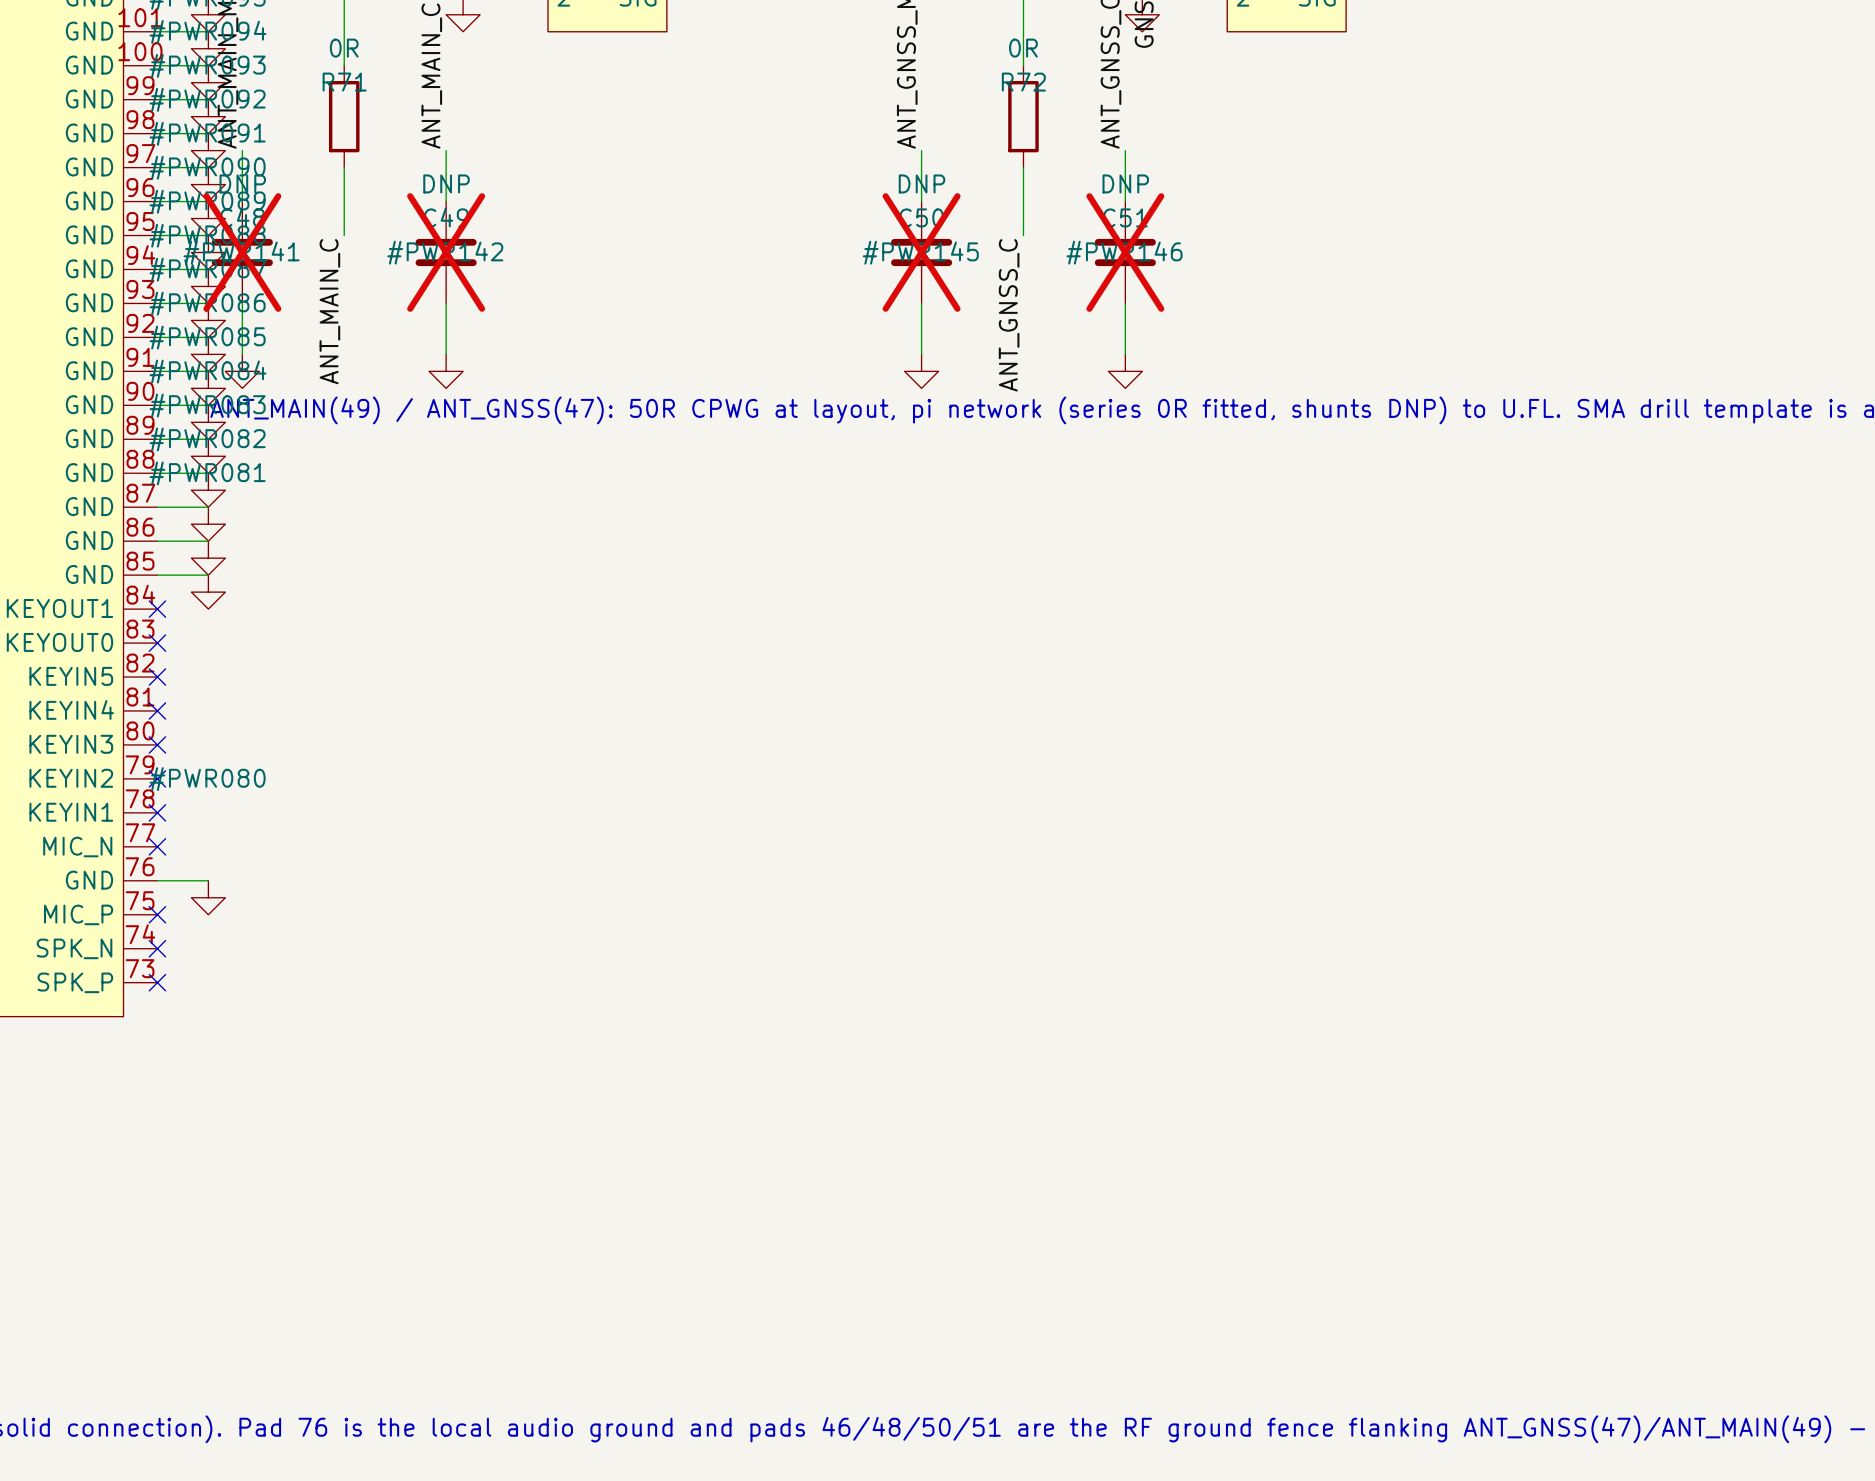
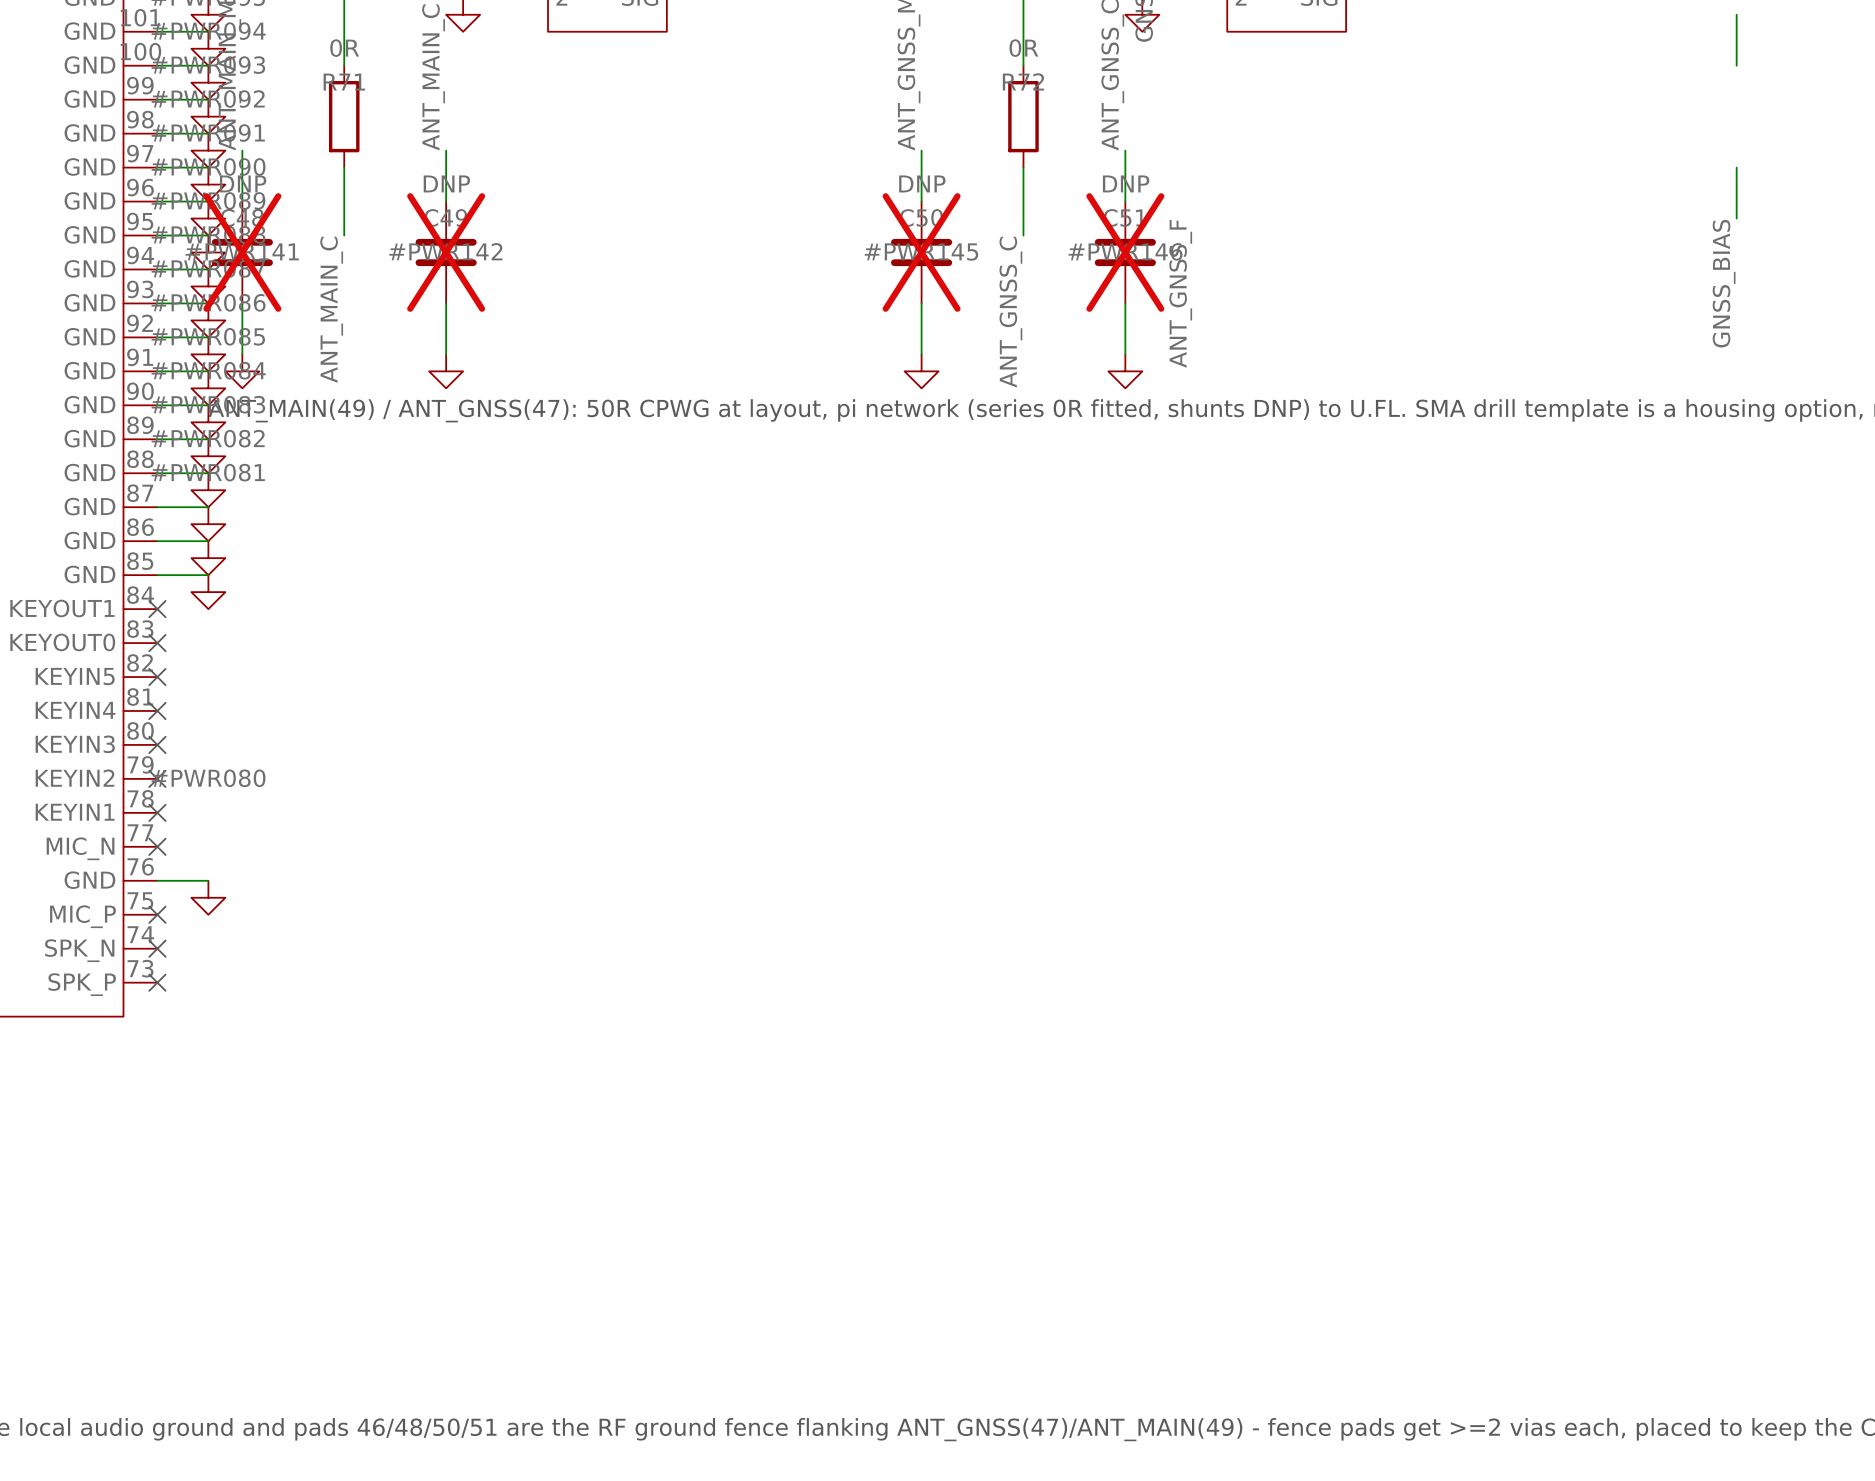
wire: none -> (1736, 14) (1736, 65)
wire: none -> (1736, 167) (1736, 218)
label: none -> GNSS_BIAS (1724, 283)
label: none -> ANT_GNSS_F (1180, 293)

